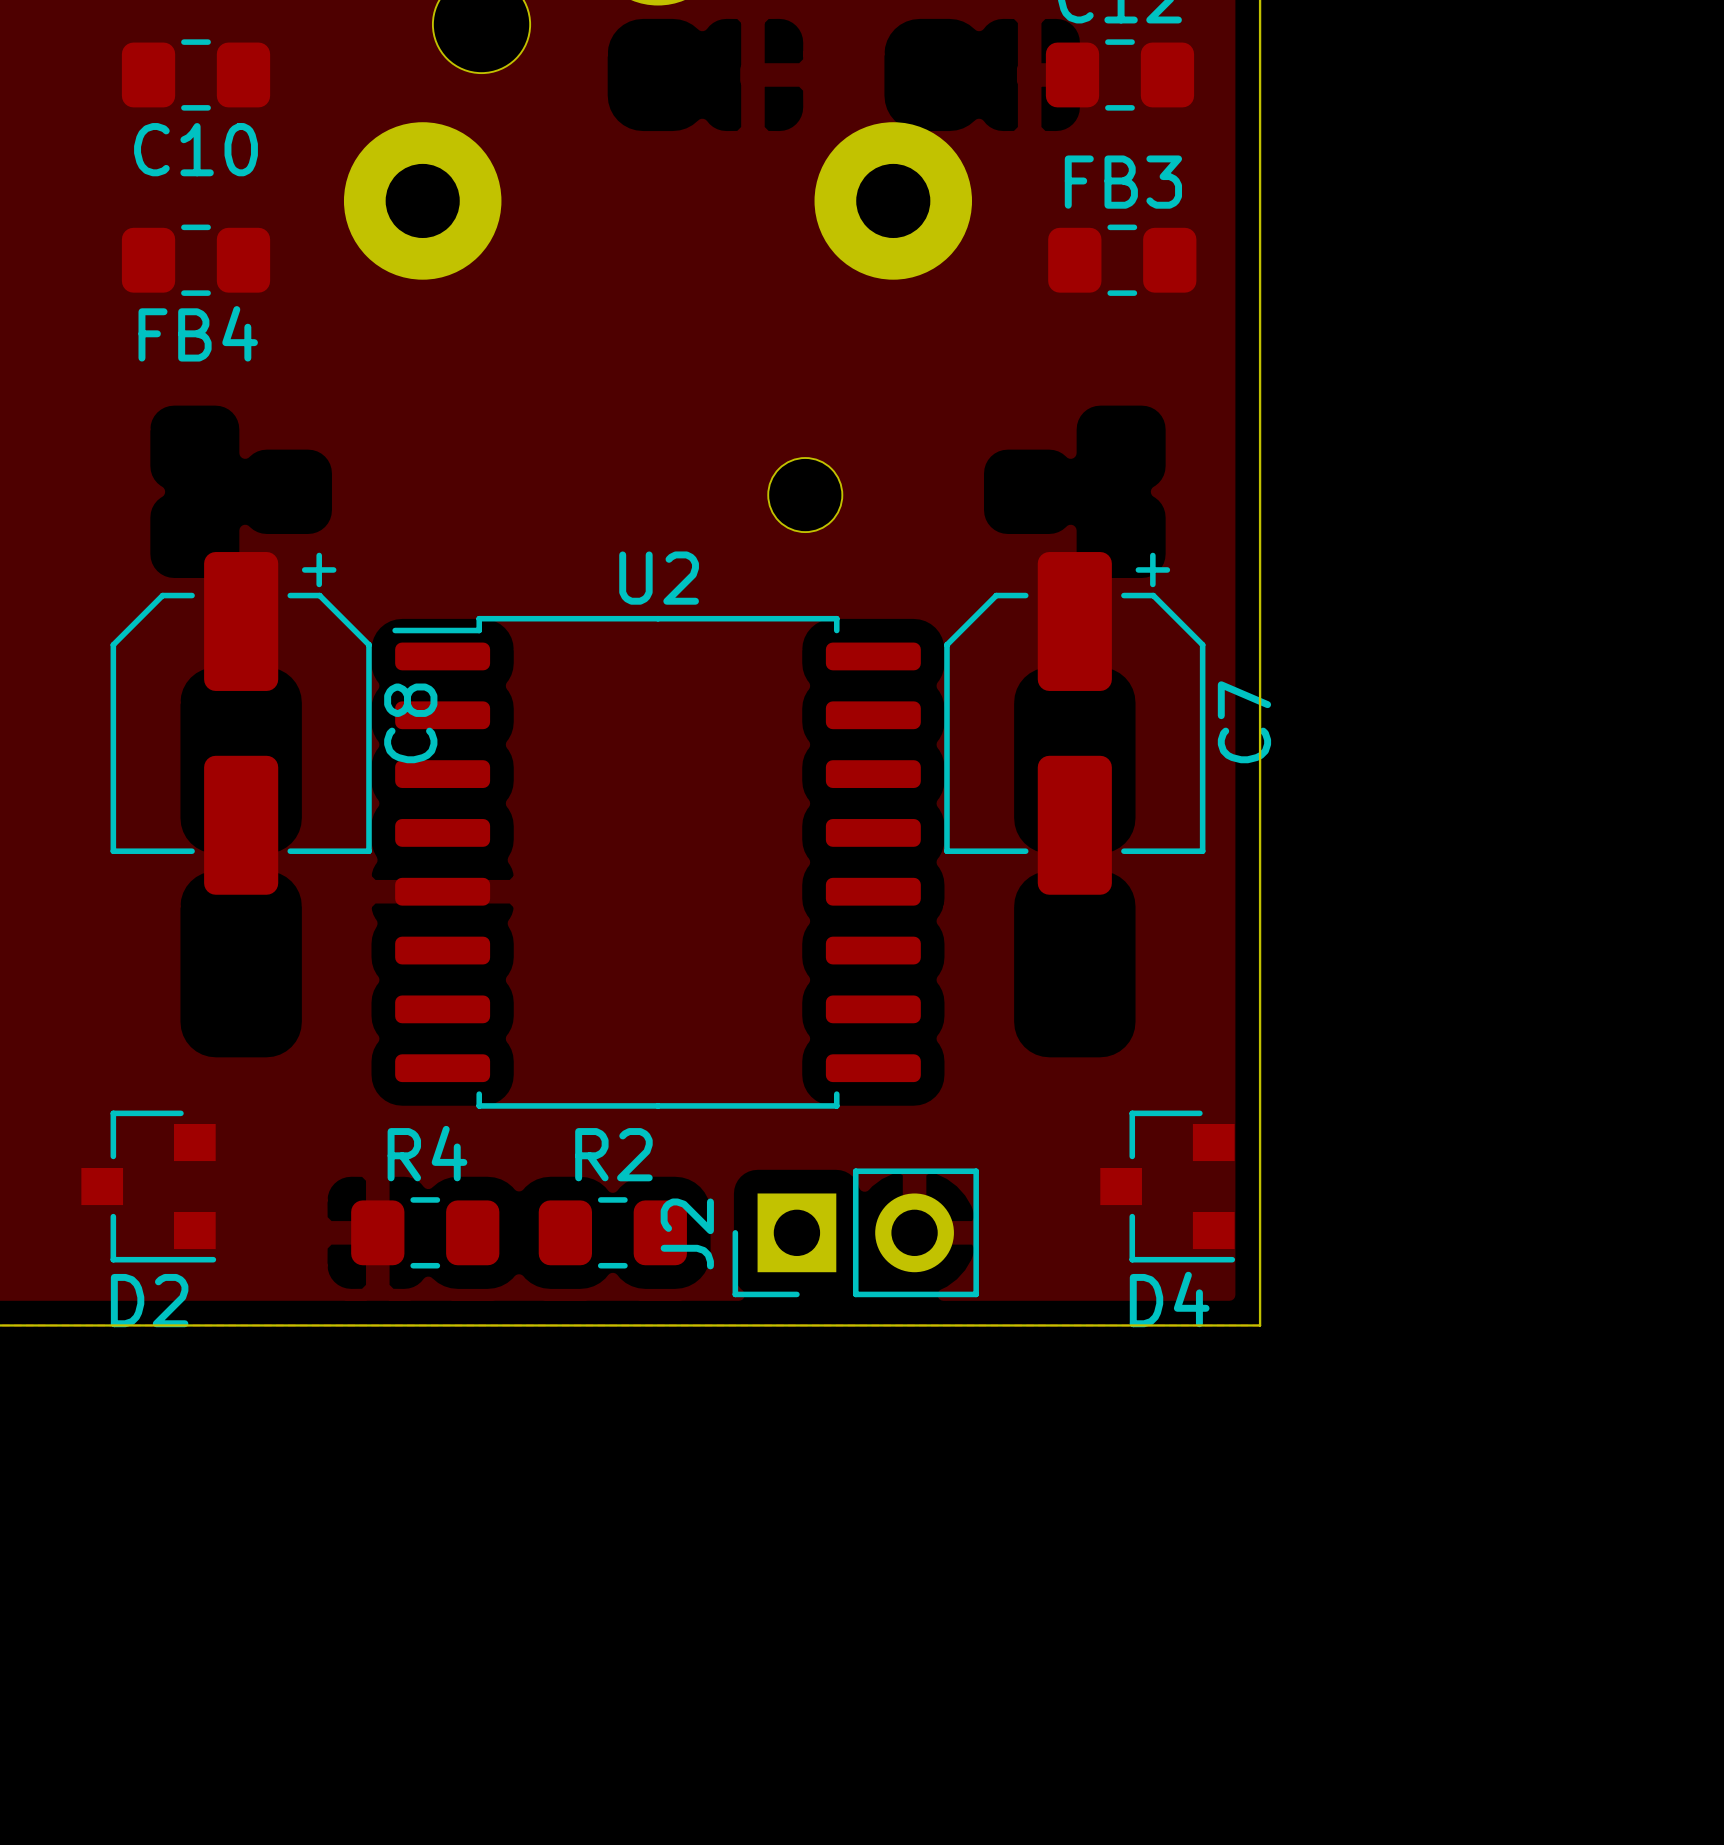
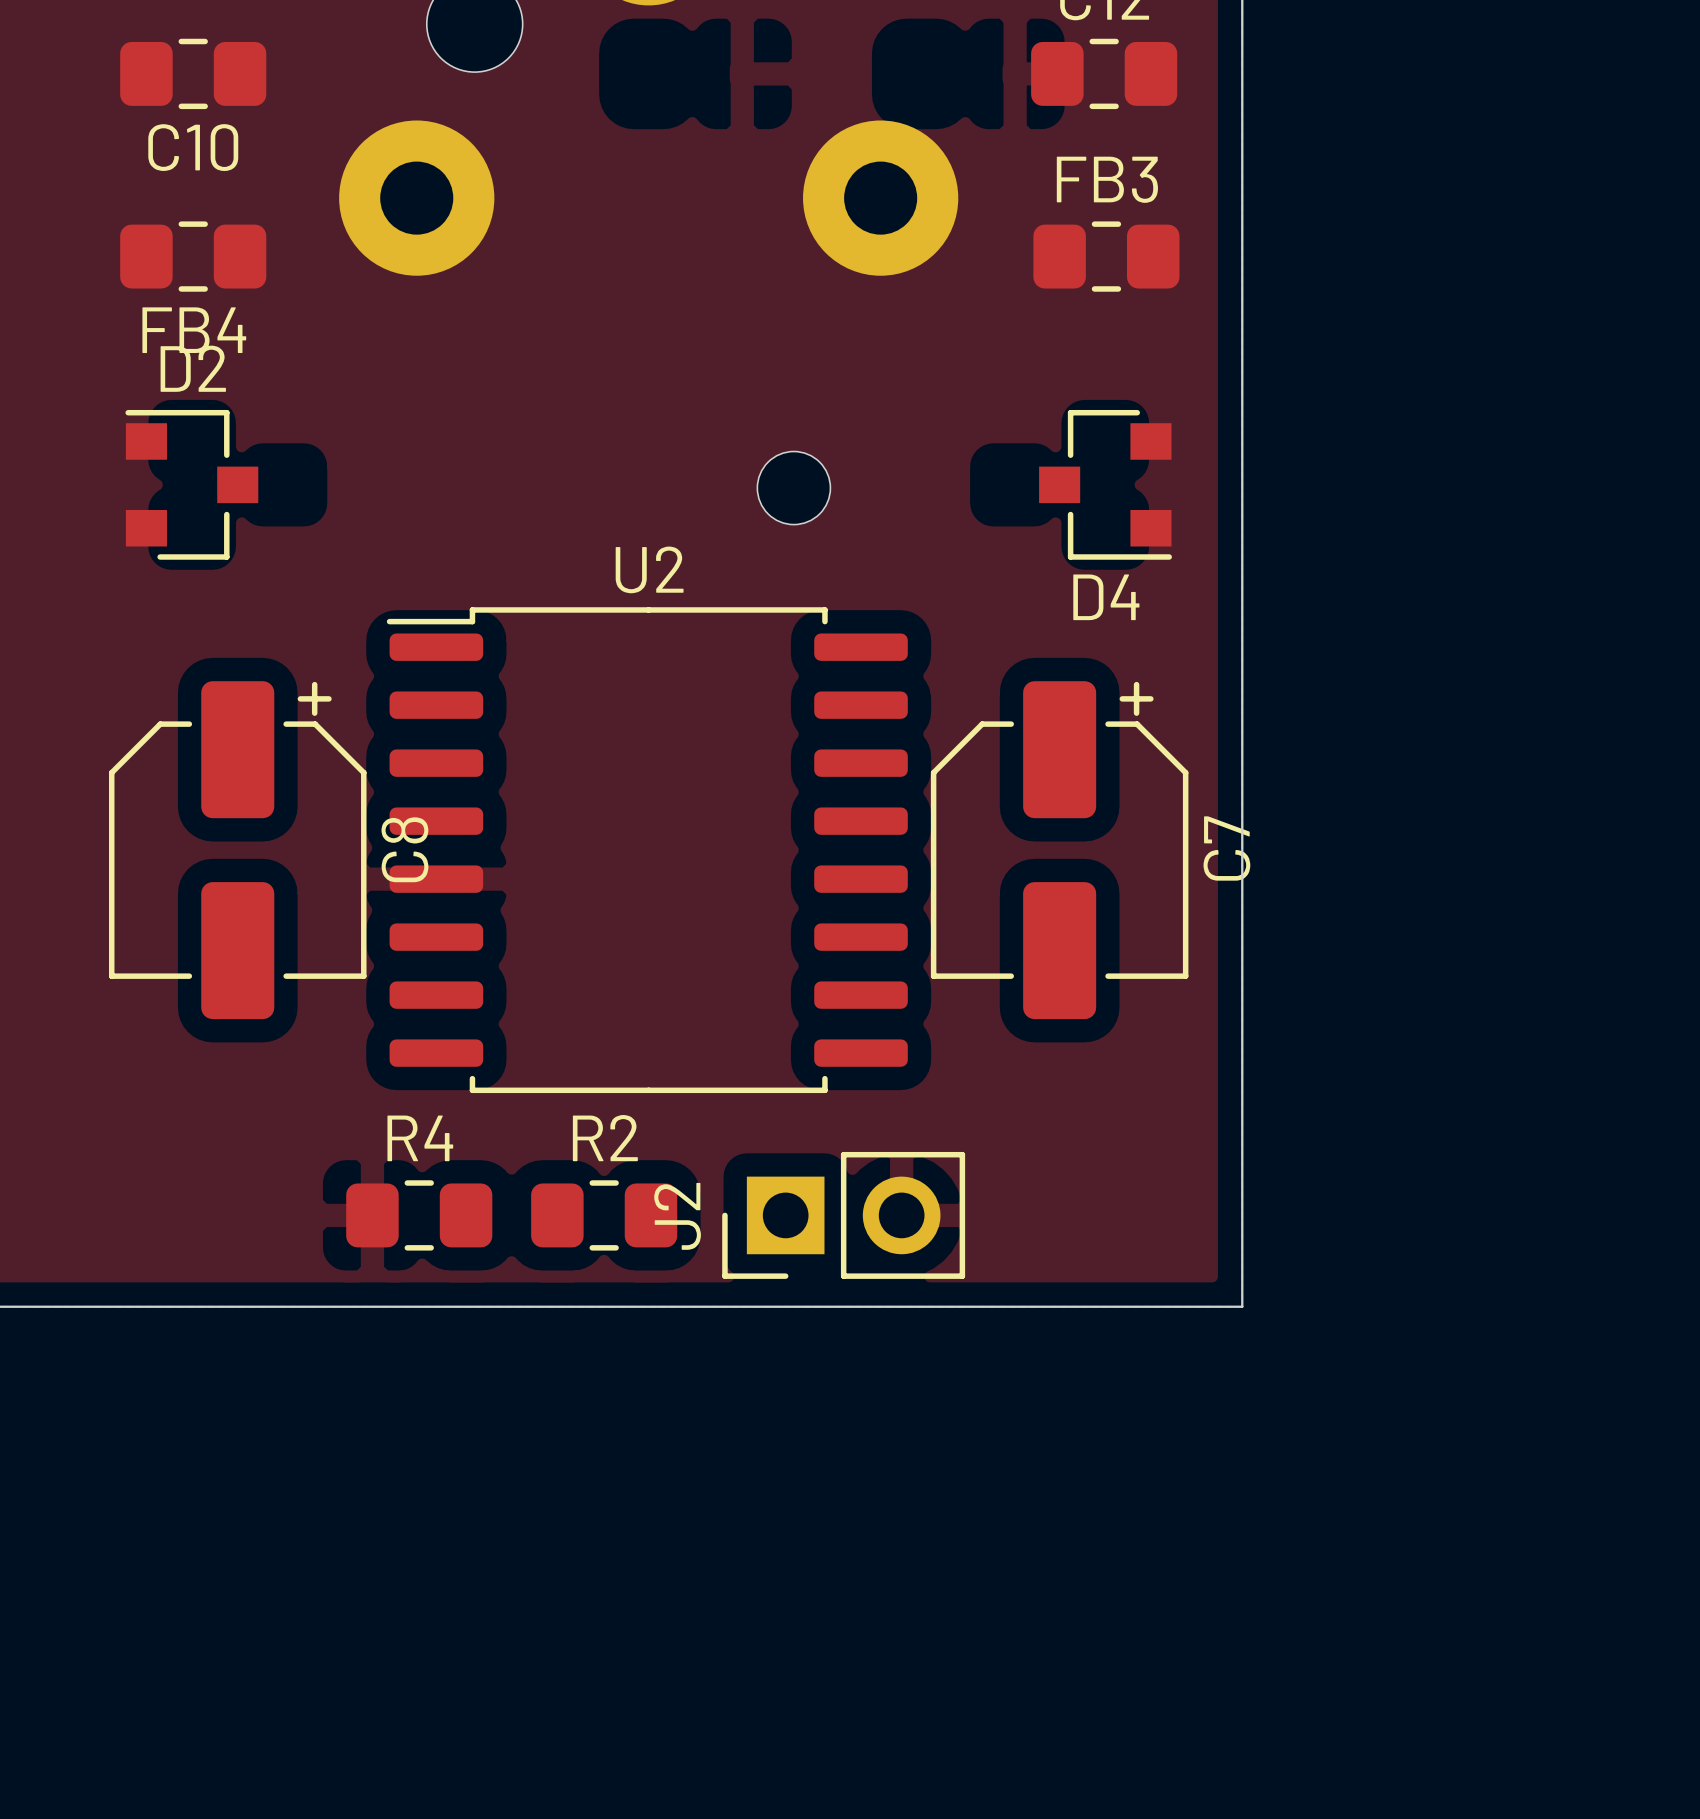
C8 position: (241, 723) -> (237, 850)
C7 position: (1074, 723) -> (1059, 850)
D2 rotation: 0° (148, 1186) -> 180° (191, 484)
D2 position: (148, 1186) -> (191, 484)
D4 position: (1167, 1186) -> (1105, 484)

